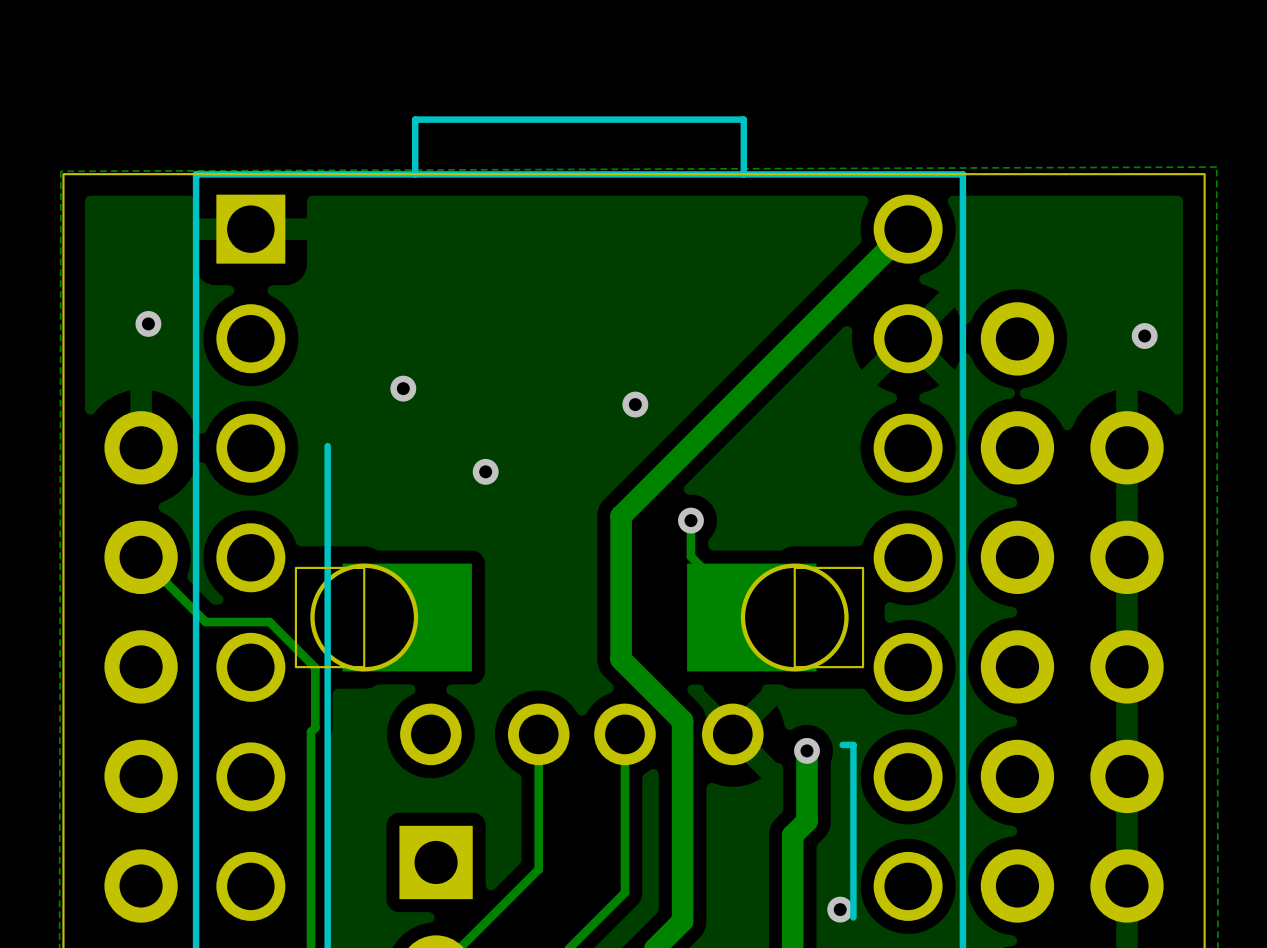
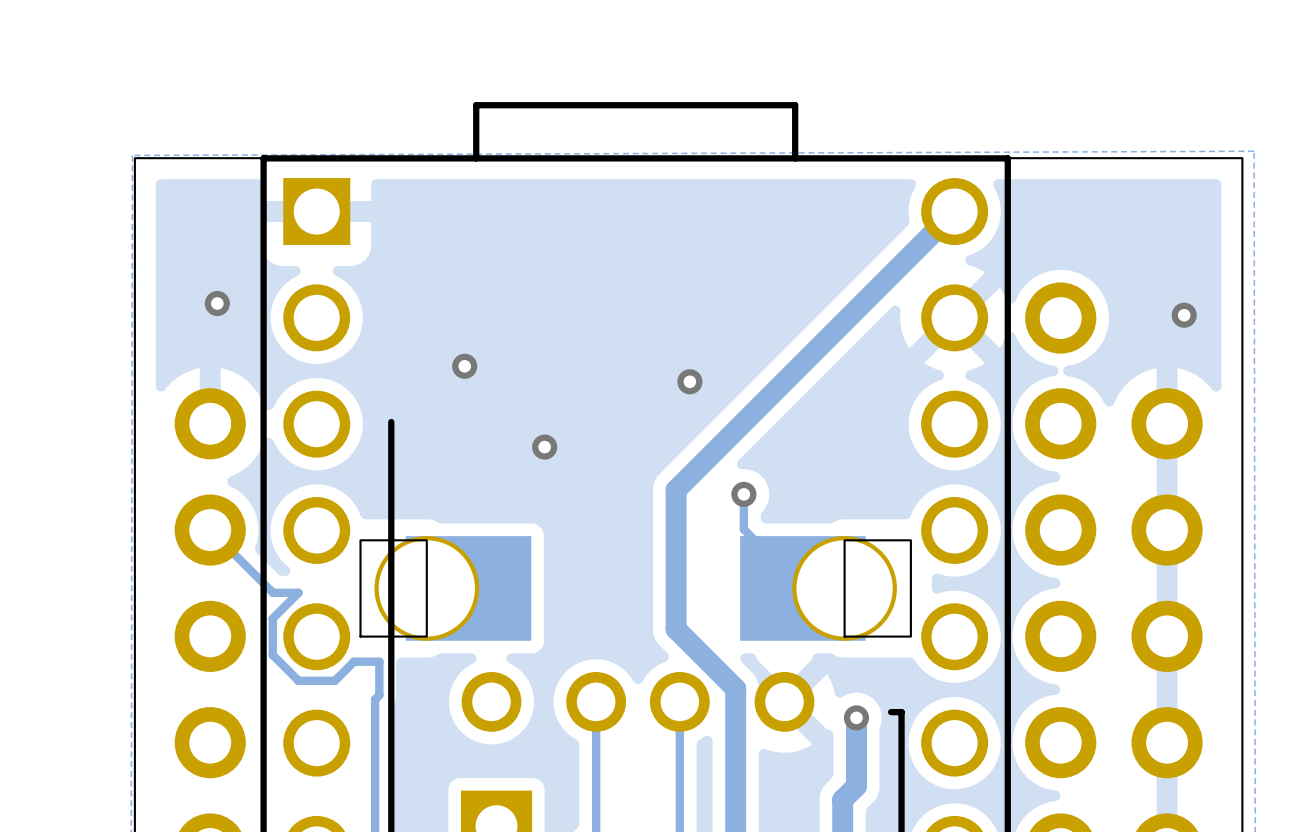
track: (232, 622) (269, 622) (315, 667) (315, 693) -> (298, 592) (272, 618) (272, 655) (298, 680) (334, 680) (354, 661) (379, 661)

